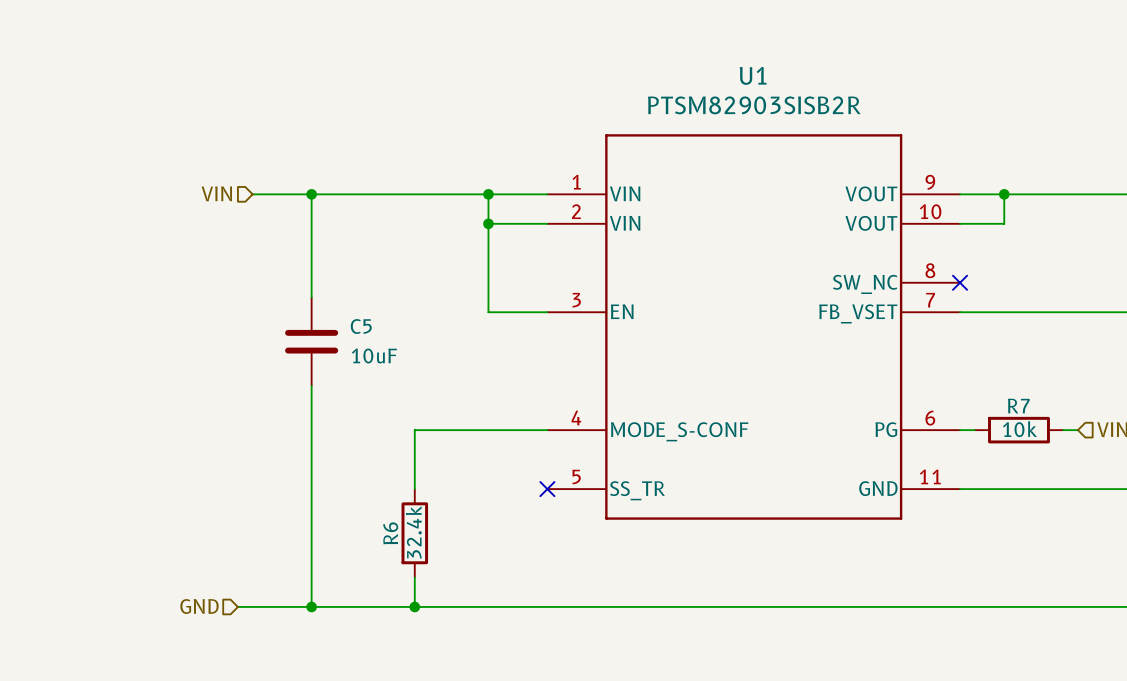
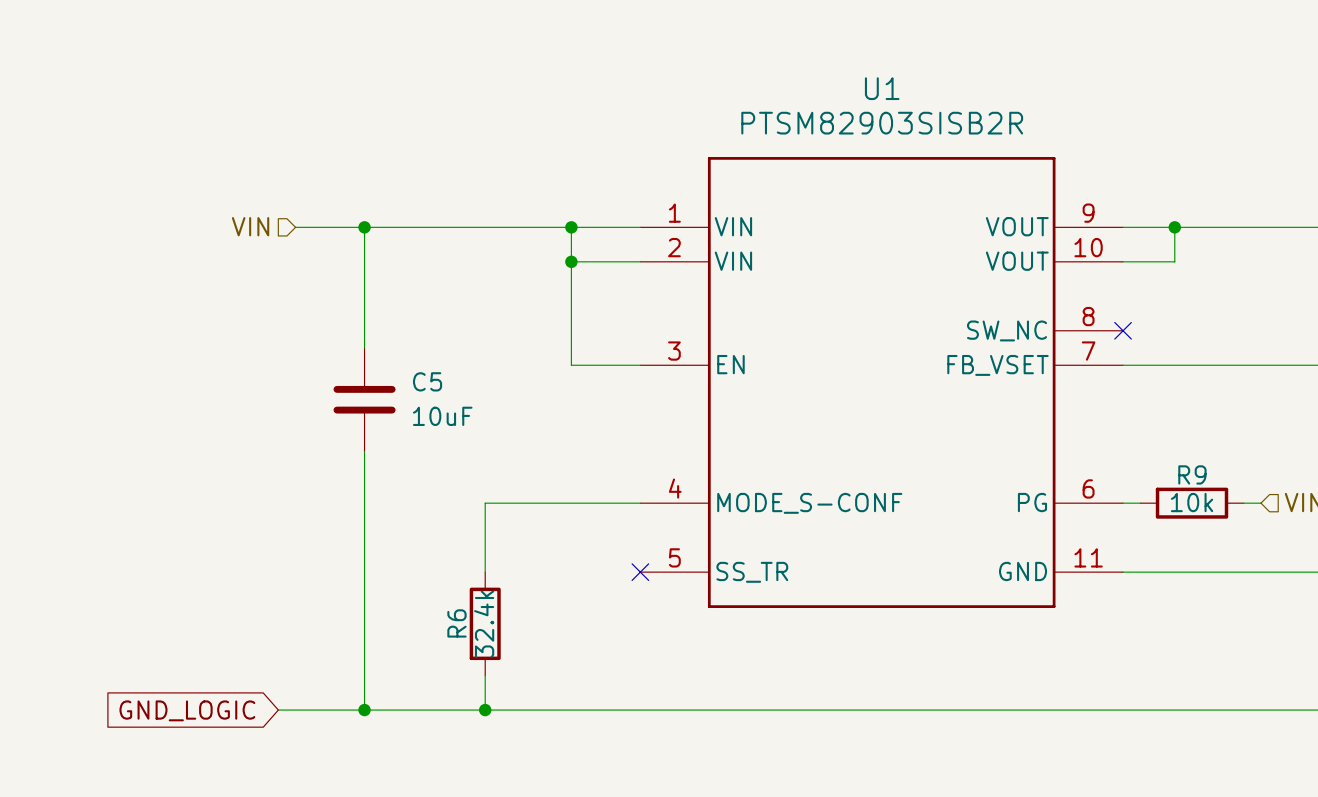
R7 name: R7 (1018, 406) -> R9 (1192, 474)
hierarchical label: GND (199, 606) -> none
global label: none -> GND_LOGIC (187, 710)

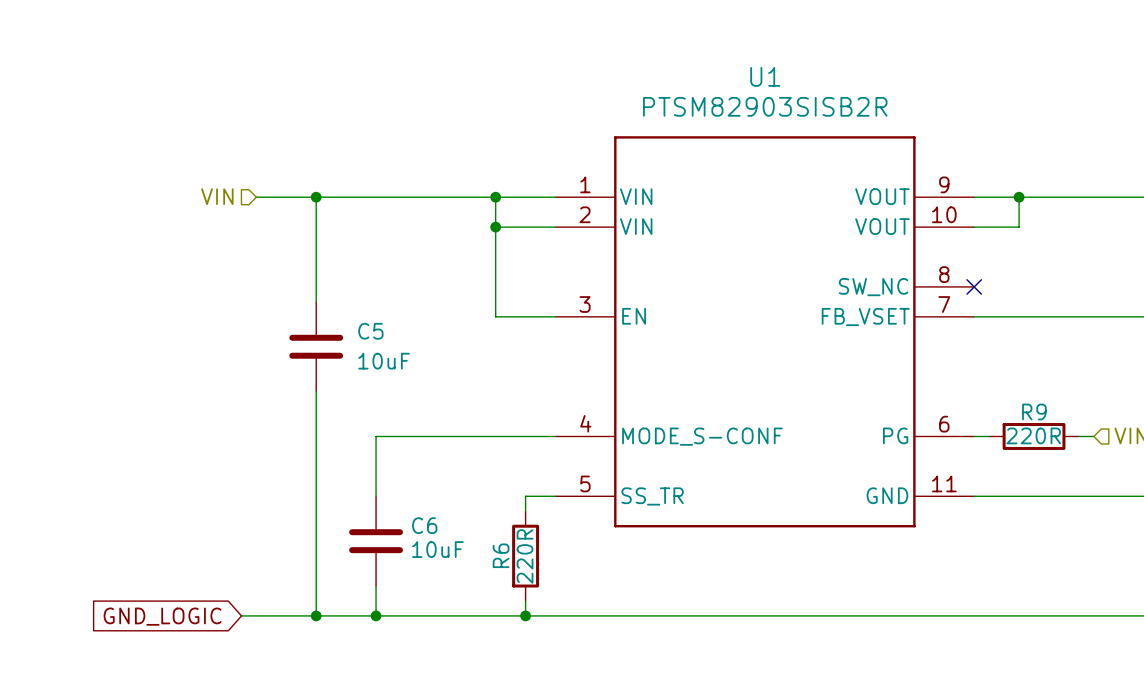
R9 value: 10k (1192, 502) -> 220R (1033, 435)
wire: (485, 503) (485, 572) -> (420, 436) (376, 436) (376, 496)
wire: none -> (555, 496) (525, 496) (525, 511)
no-connect mark: (640, 572) -> none
C6: none -> 10uF (376, 541)
R6 position: (485, 623) -> (525, 556)
R6 value: 32.4k (484, 624) -> 220R (525, 556)
wire: (485, 675) (485, 710) -> (376, 586) (376, 615)
wire: none -> (525, 600) (525, 615)
junction position: (485, 710) -> (376, 615)
junction: none -> (525, 615)

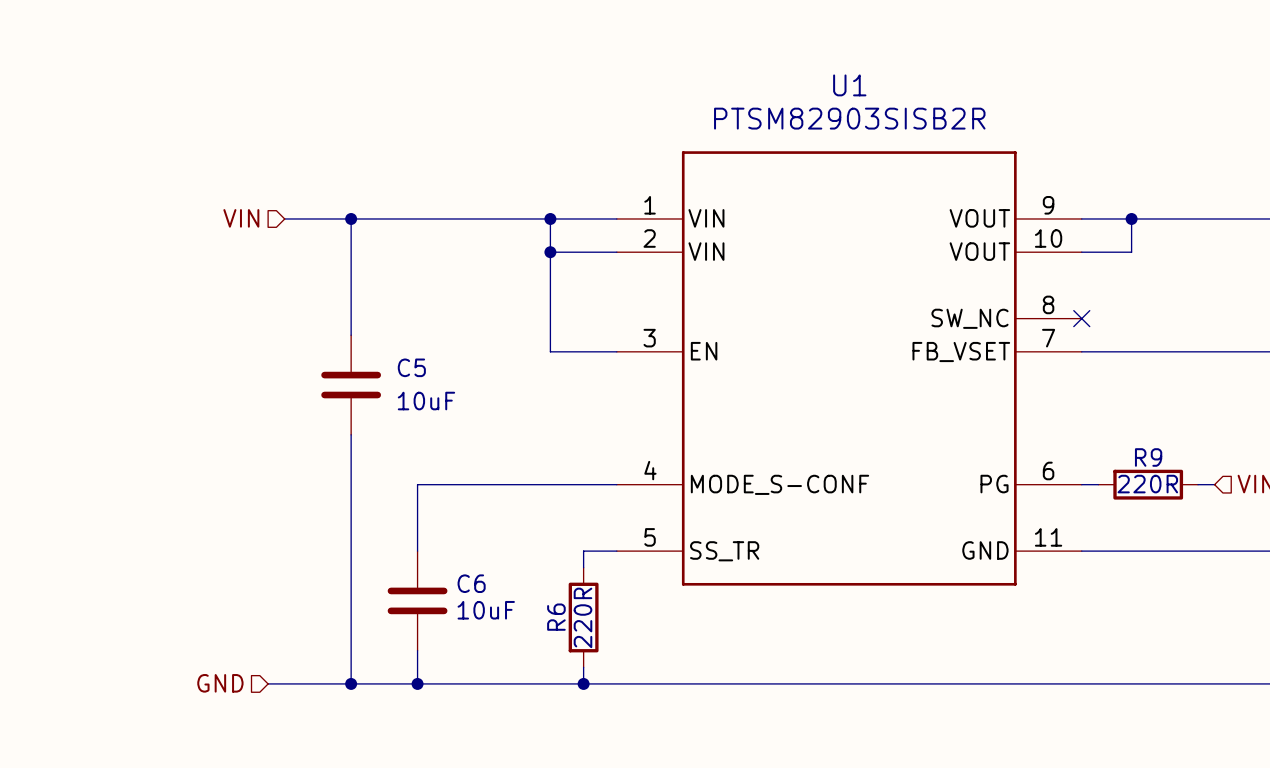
hierarchical label: none -> GND (220, 683)
global label: GND_LOGIC (162, 616) -> none

